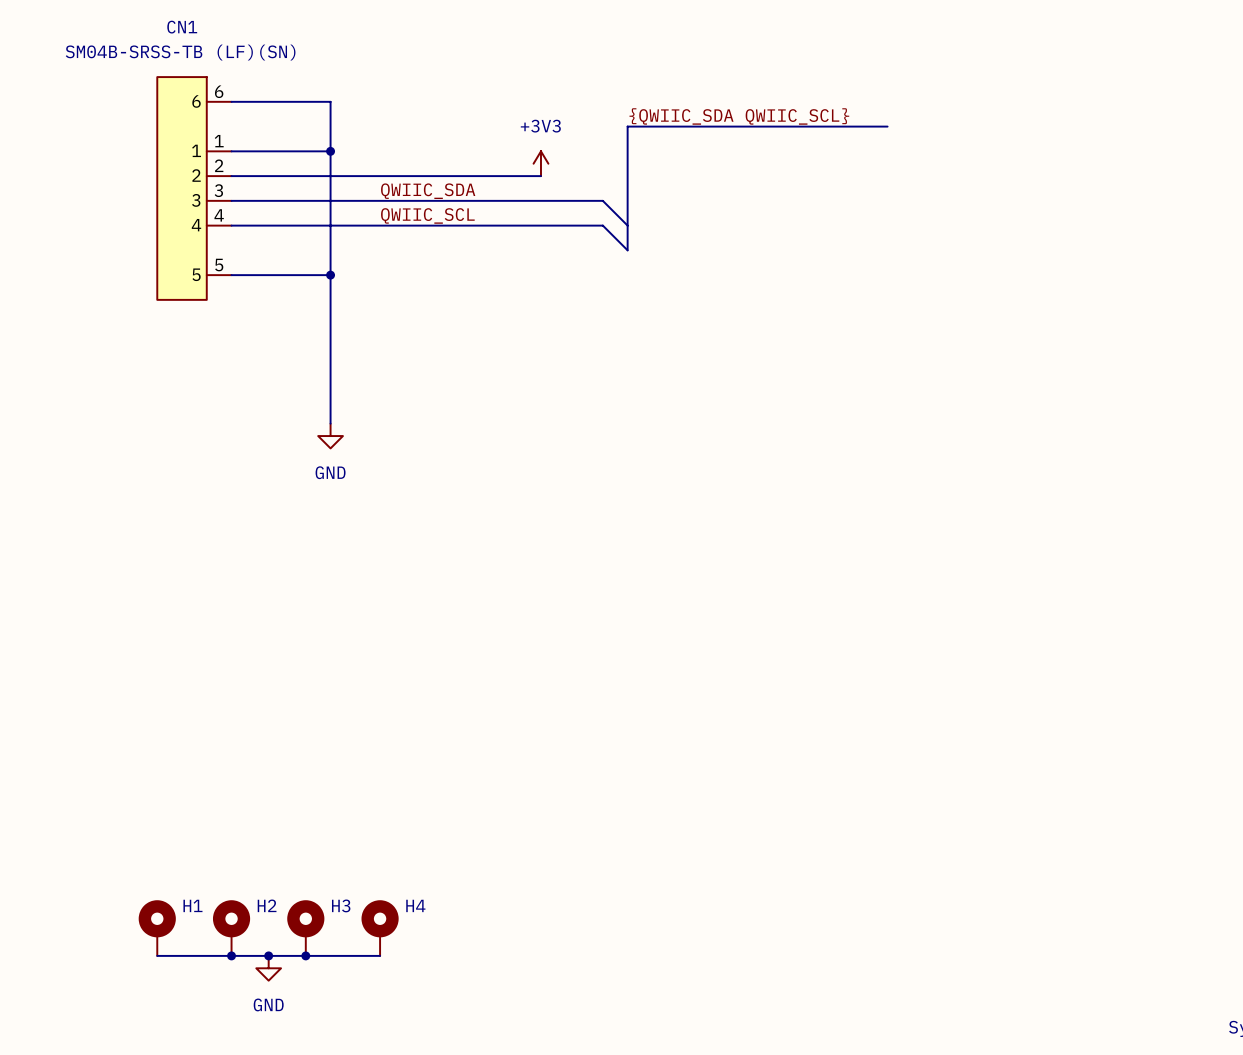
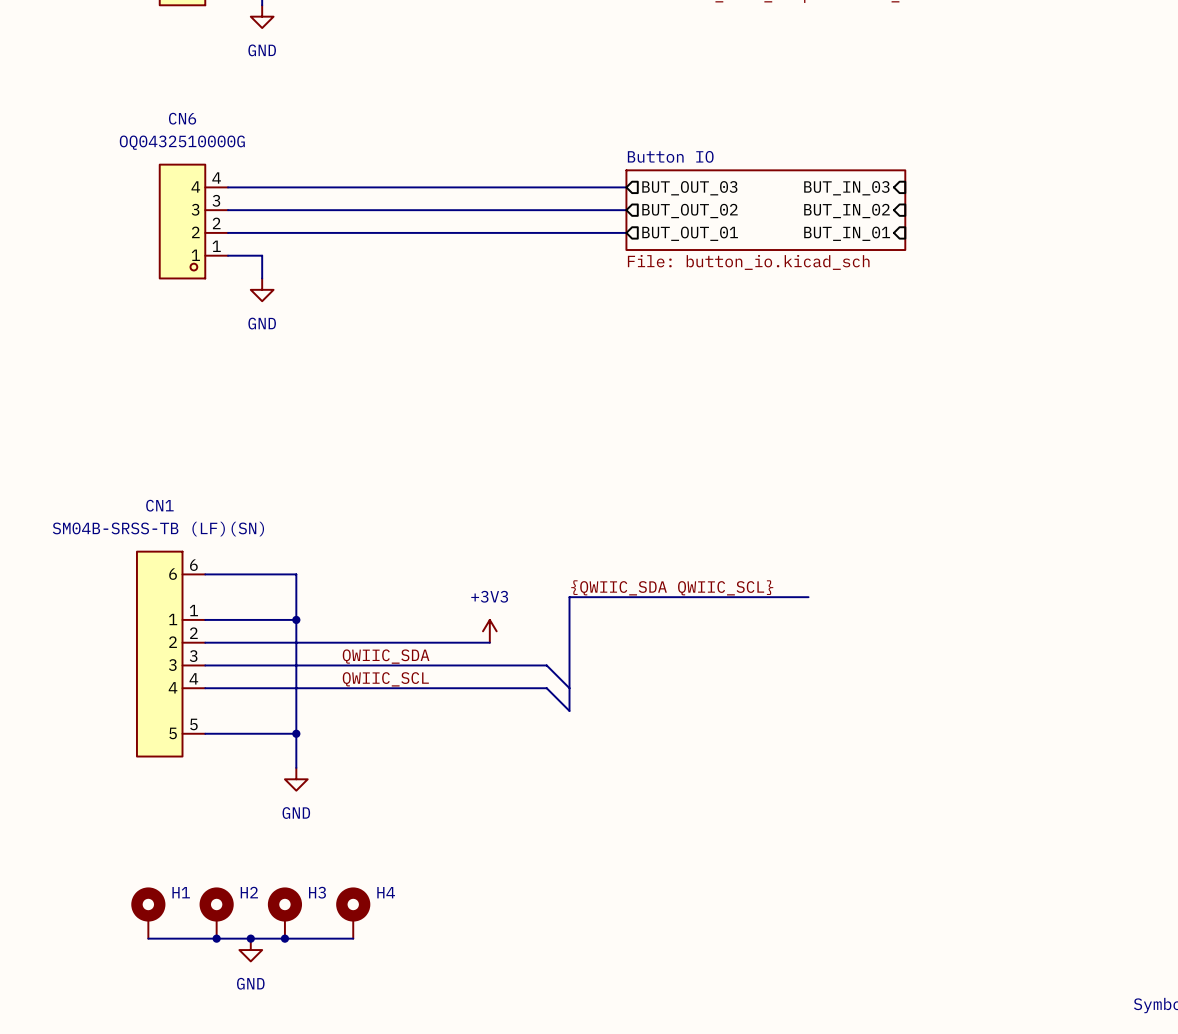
wire: (231, 101) (330, 101) (330, 423) -> none
label: {QWIIC_SDA QWIIC_SCL} (739, 116) -> none
bus: (887, 126) (627, 126) (627, 250) -> none
wire: none -> (228, 187) (626, 187)
sheet pin: none -> BUT_OUT_03 (689, 188)
sheet pin: none -> BUT_IN_03 (846, 188)
wire: (231, 151) (330, 151) -> none
junction: (330, 151) -> none
wire: none -> (228, 210) (626, 210)
power symbol: +3V3 (540, 163) -> none
sheet Button IO: none -> File: button_io.kicad_sch (765, 210)
sheet pin: none -> BUT_OUT_02 (690, 211)
sheet pin: none -> BUT_IN_02 (847, 211)
CN6: none -> OQ0432510000G (193, 221)
wire: (231, 176) (540, 176) -> none
CN1 position: (194, 188) -> (171, 654)
wire: none -> (228, 232) (626, 232)
sheet pin: none -> BUT_OUT_01 (690, 233)
sheet pin: none -> BUT_IN_01 (847, 233)
label: QWIIC_SDA (428, 191) -> none
wire: (231, 200) (602, 200) (627, 225) -> none
wire: none -> (228, 255) (262, 255) (262, 278)
label: QWIIC_SCL (427, 215) -> none
wire: (231, 225) (602, 225) (627, 250) -> none
power symbol: none -> GND (262, 289)
wire: (231, 275) (330, 275) -> none
junction: (330, 275) -> none
power symbol: GND (330, 436) -> none
wire: none -> (205, 574) (296, 574) (296, 767)
label: none -> {QWIIC_SDA QWIIC_SCL} (672, 587)
bus: none -> (808, 597) (569, 597) (569, 711)
wire: none -> (205, 619) (296, 619)
junction: none -> (296, 619)
power symbol: none -> +3V3 (489, 631)
wire: none -> (205, 642) (489, 642)
label: none -> QWIIC_SDA (386, 656)
wire: none -> (205, 665) (546, 665) (569, 688)
label: none -> QWIIC_SCL (385, 679)
wire: none -> (205, 688) (546, 688) (569, 711)
wire: none -> (205, 733) (296, 733)
junction: none -> (296, 733)
power symbol: none -> GND (296, 779)

